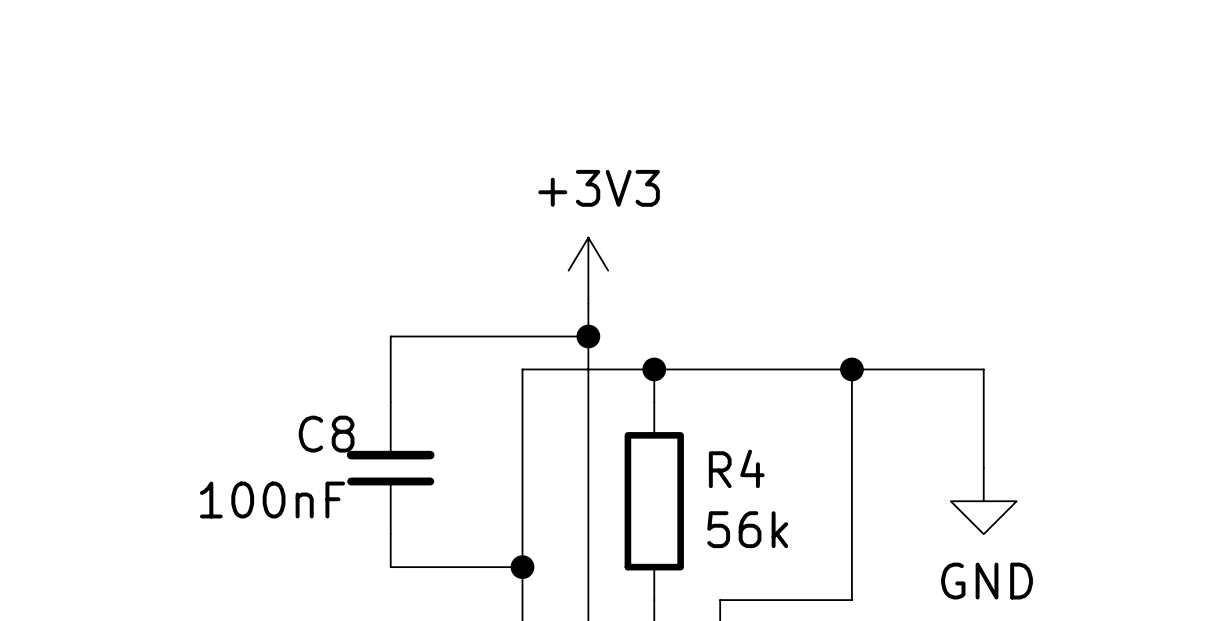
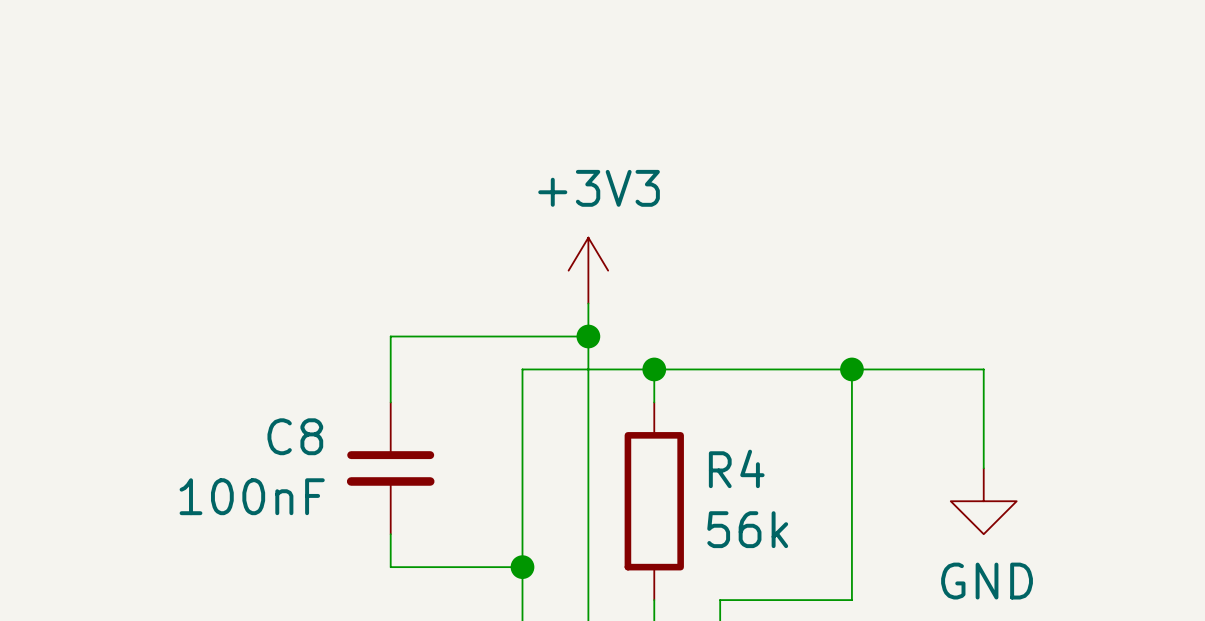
C8 rotation: 0° (390, 468) -> 180° (390, 468)

